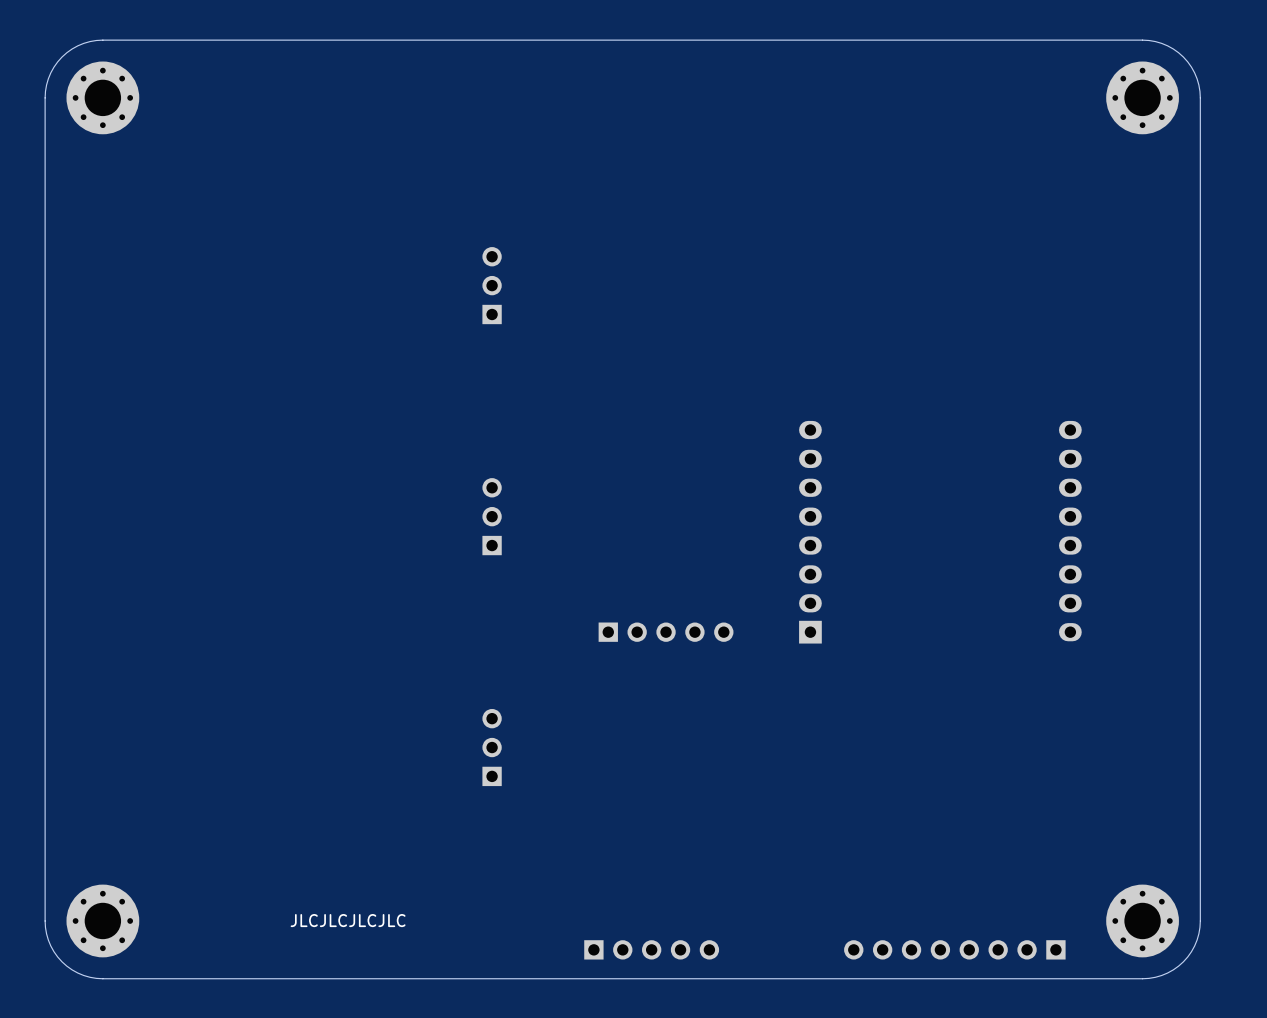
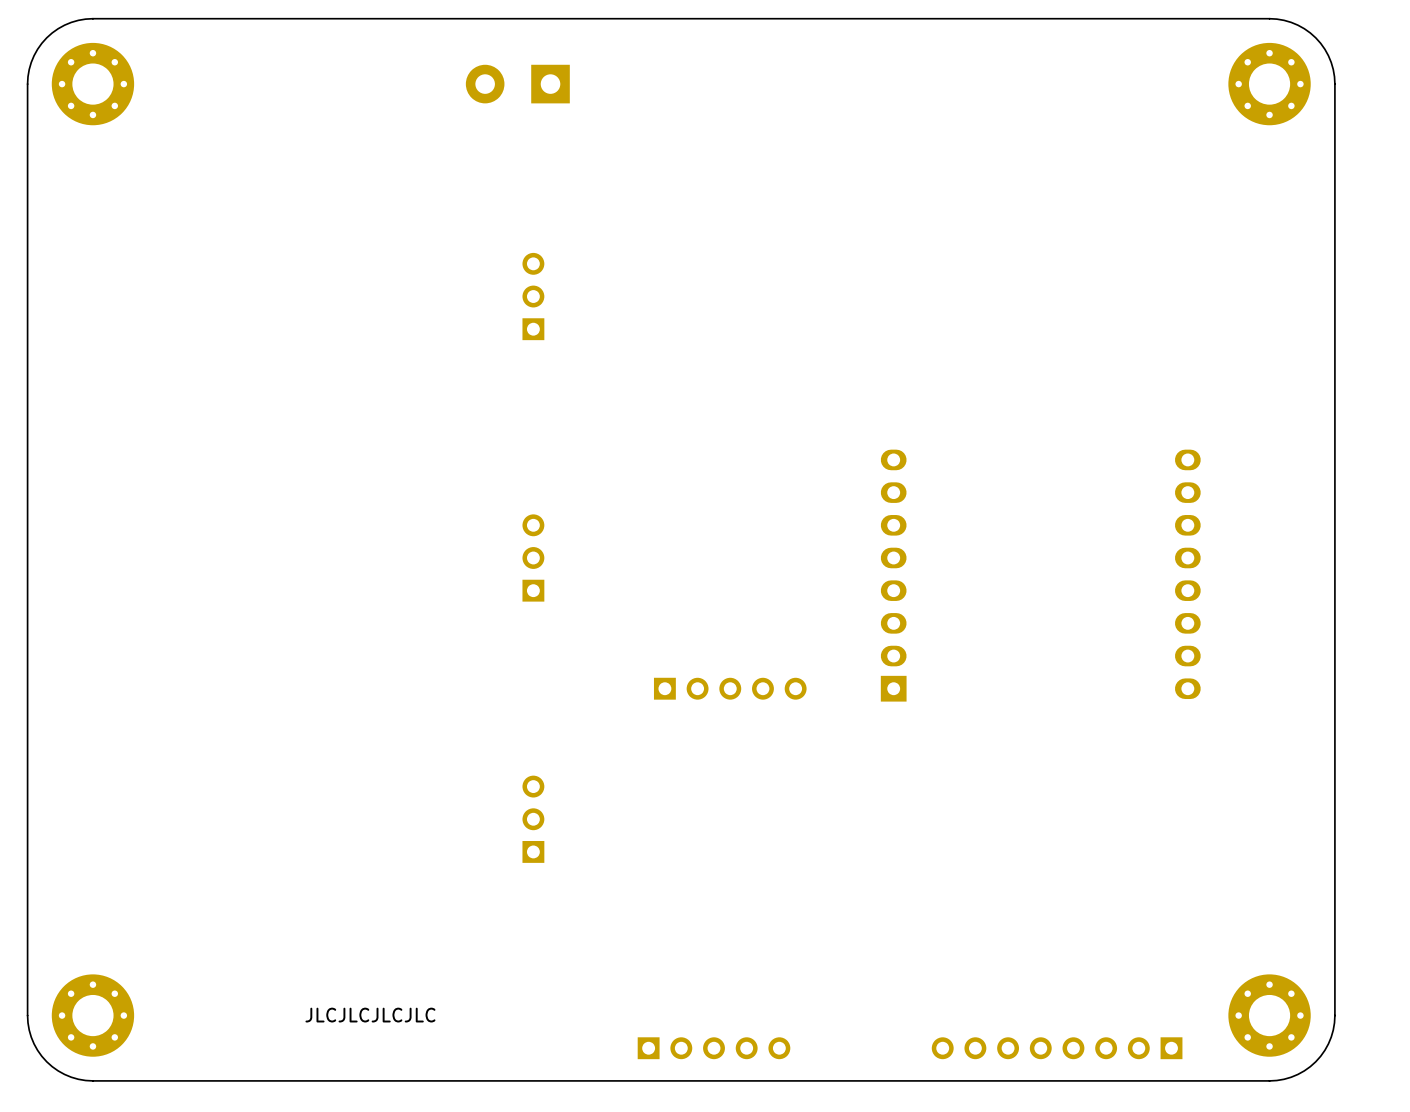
part: none -> (517, 84)

